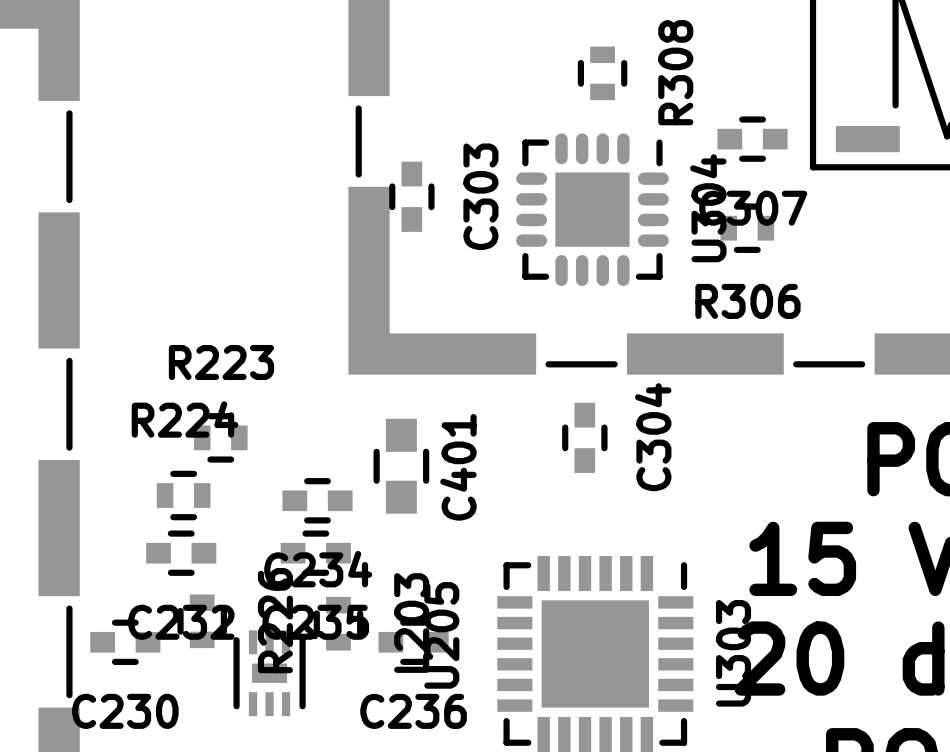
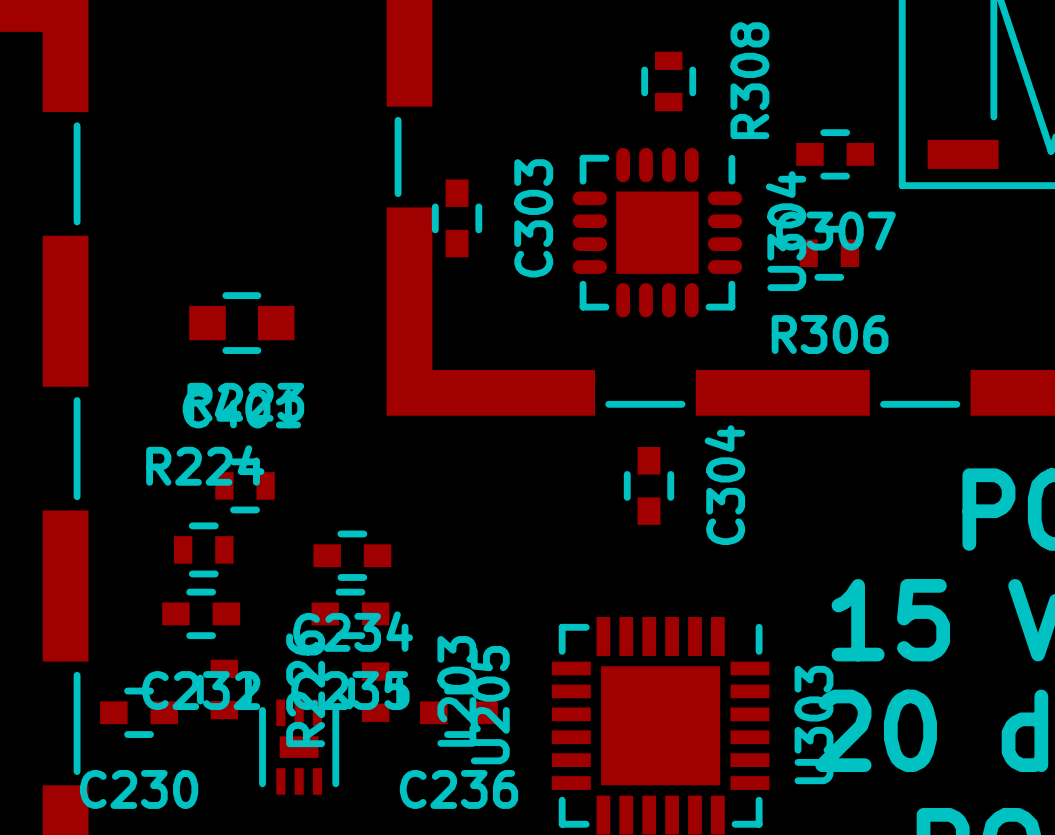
C401 rotation: 0° (401, 466) -> 90° clockwise (241, 323)
C401 position: (401, 466) -> (241, 323)

